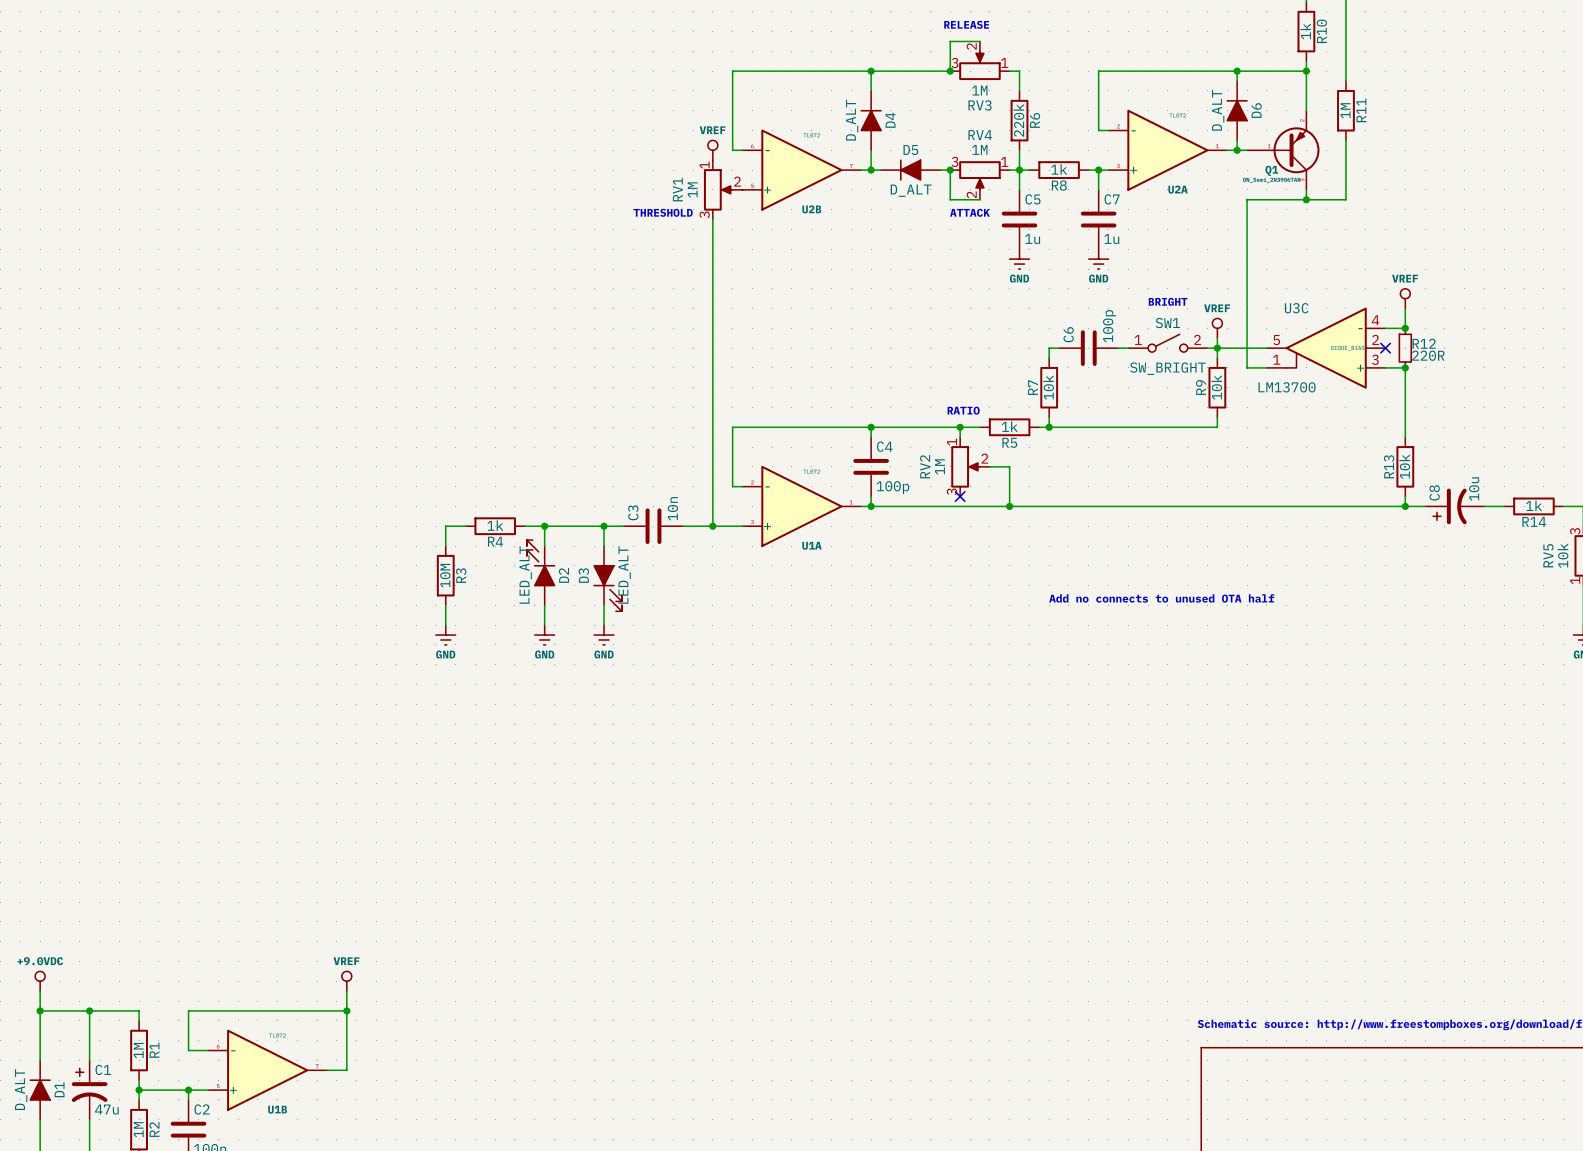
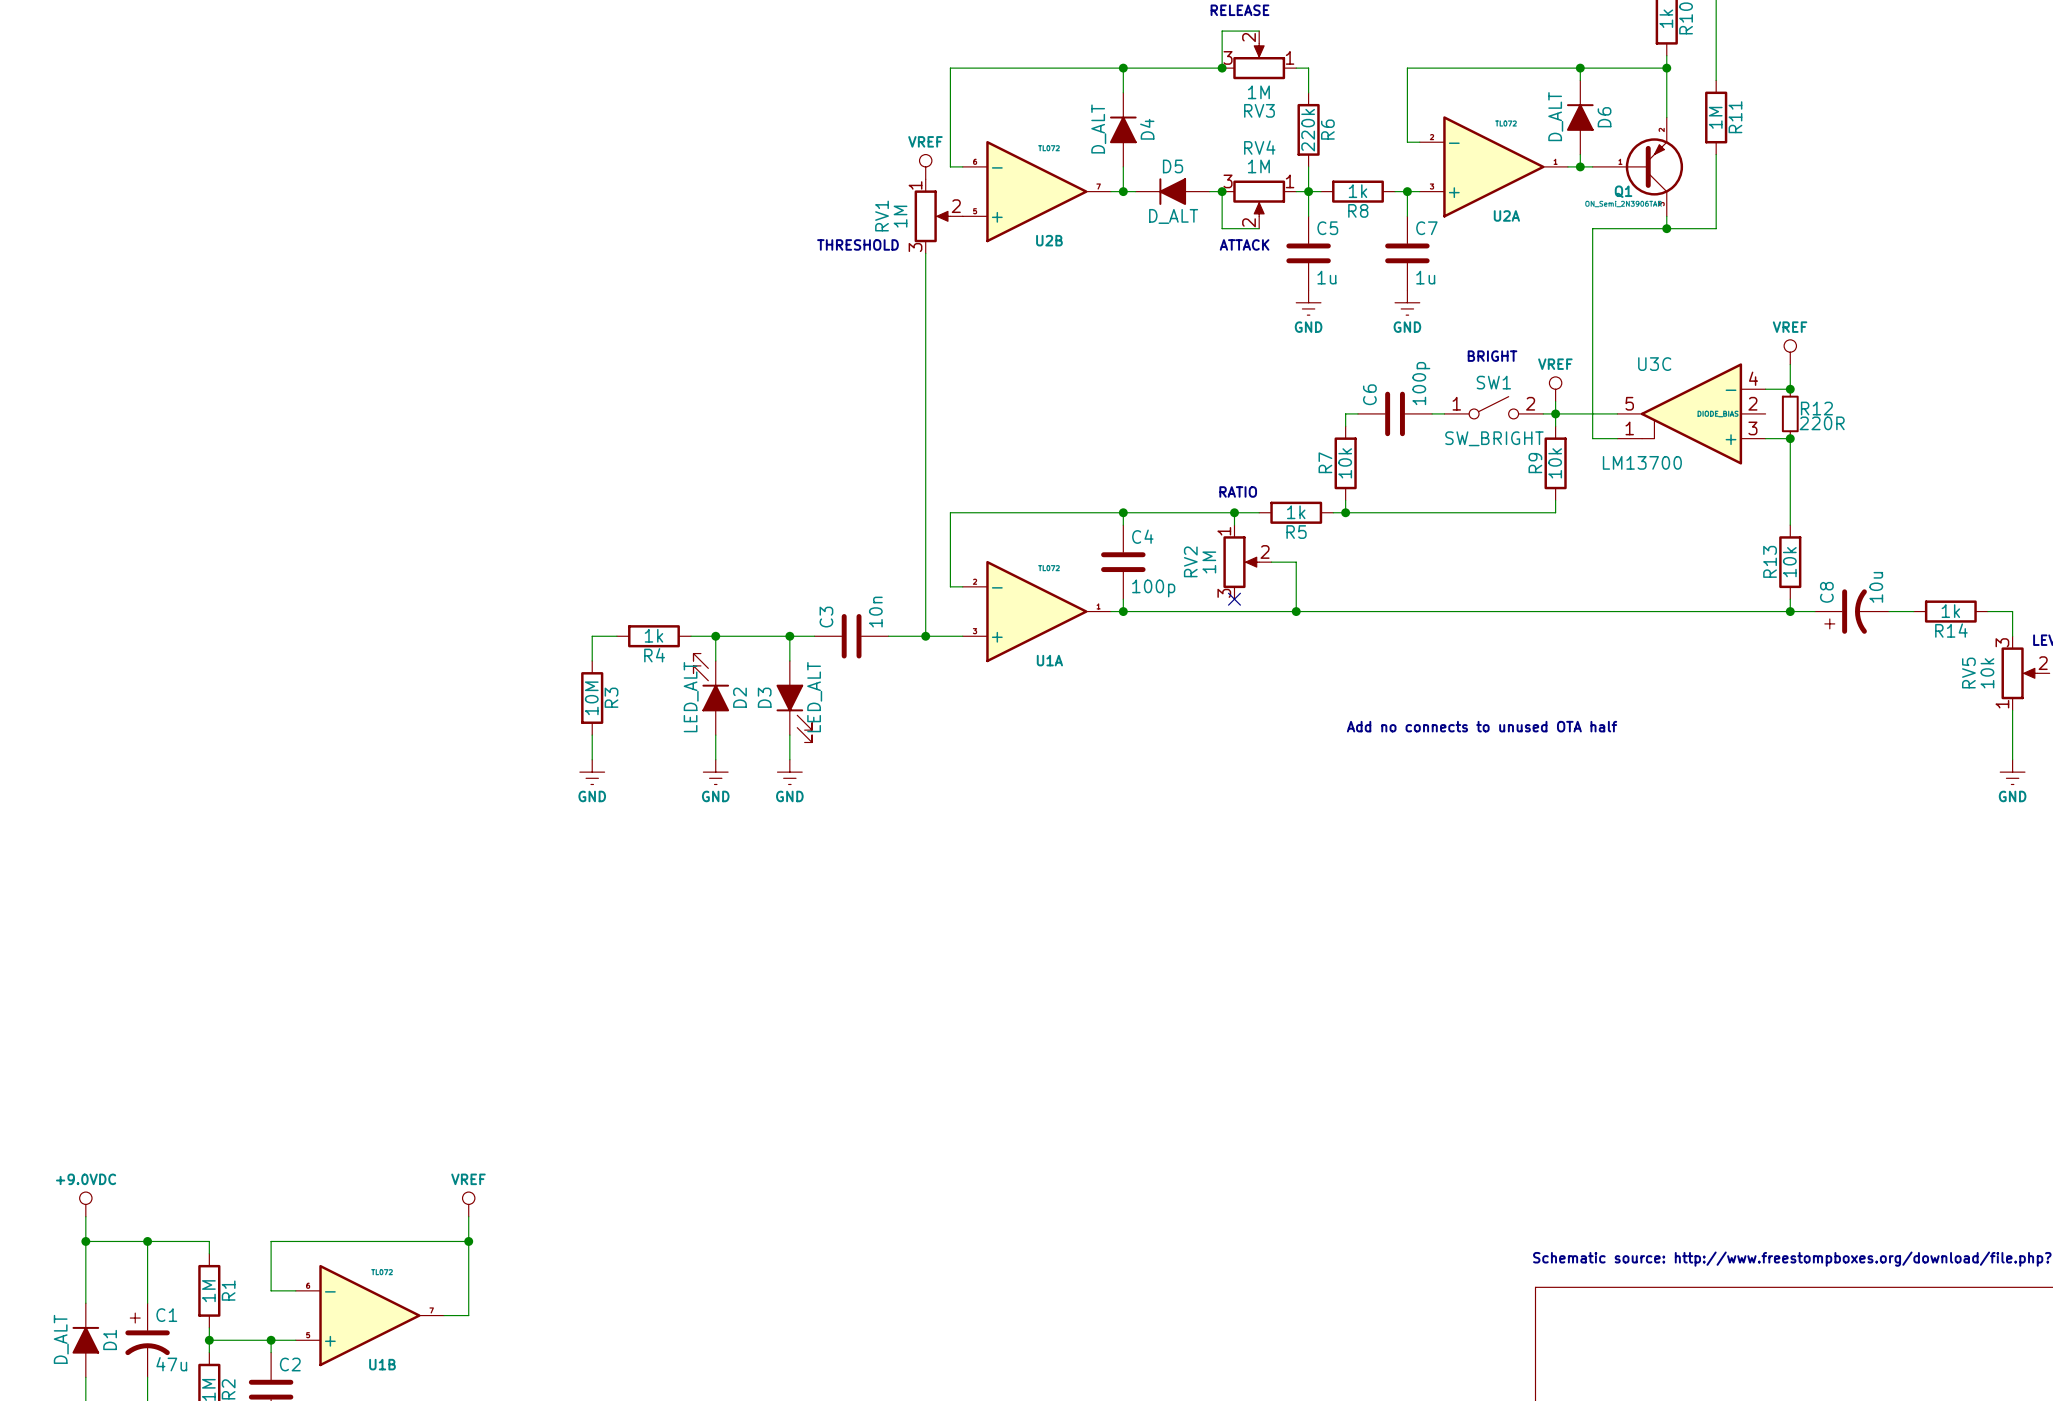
no-connect mark: (1385, 348) -> none

